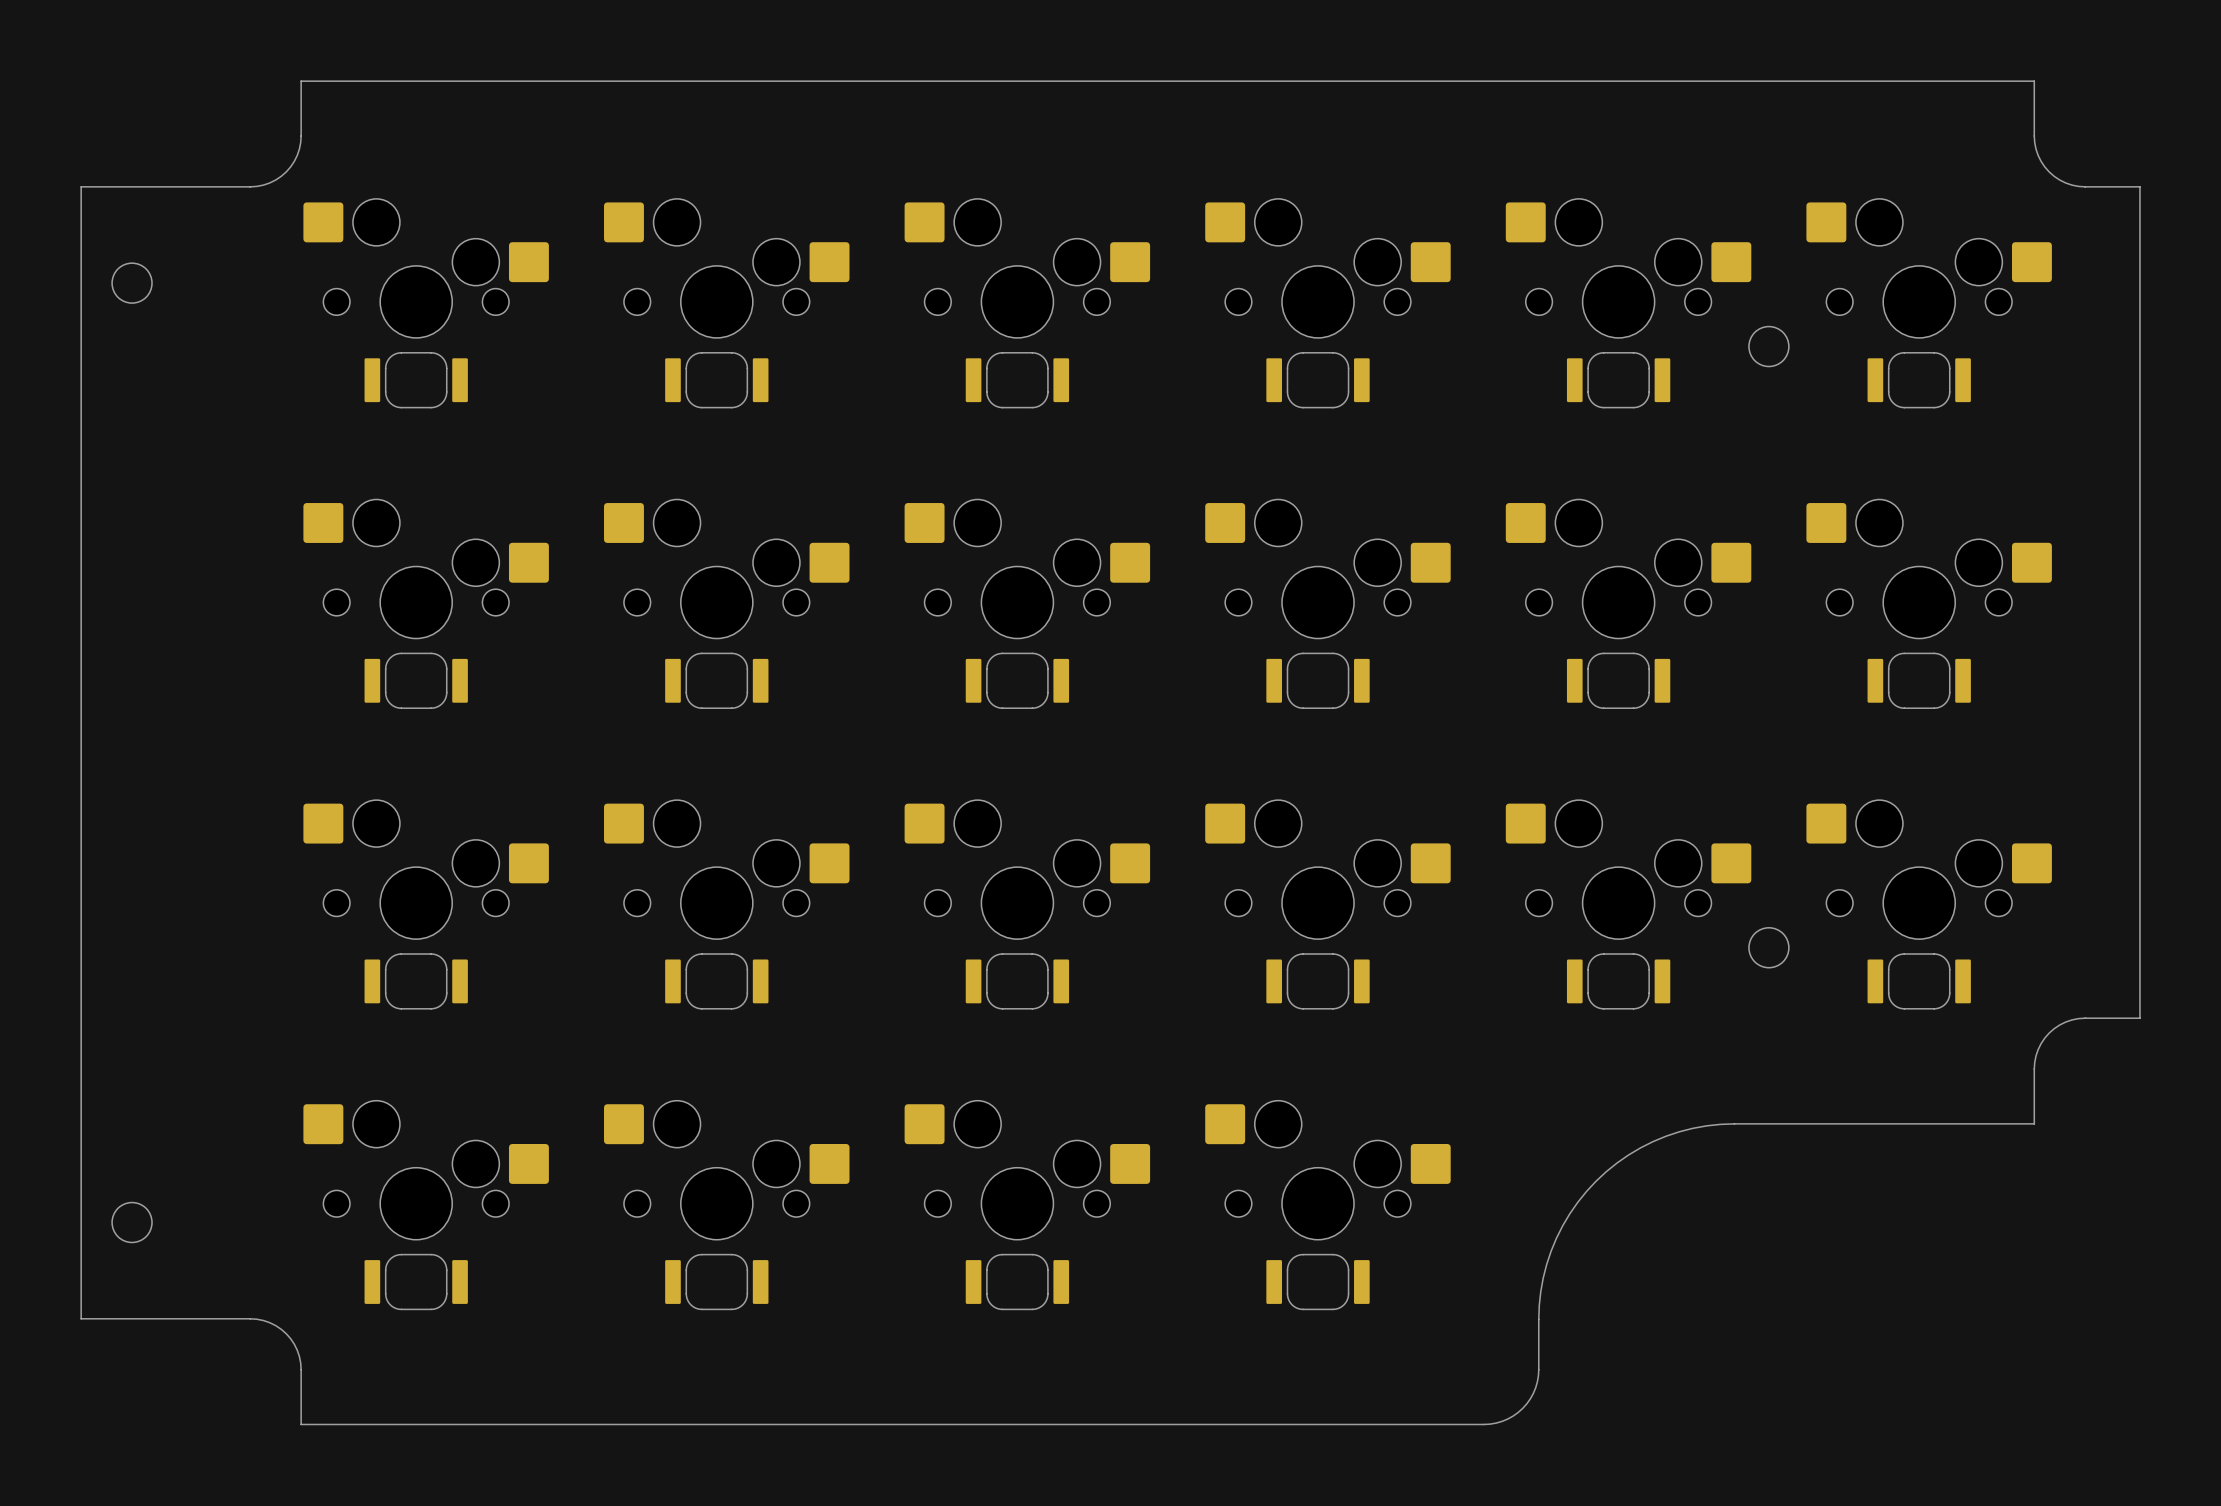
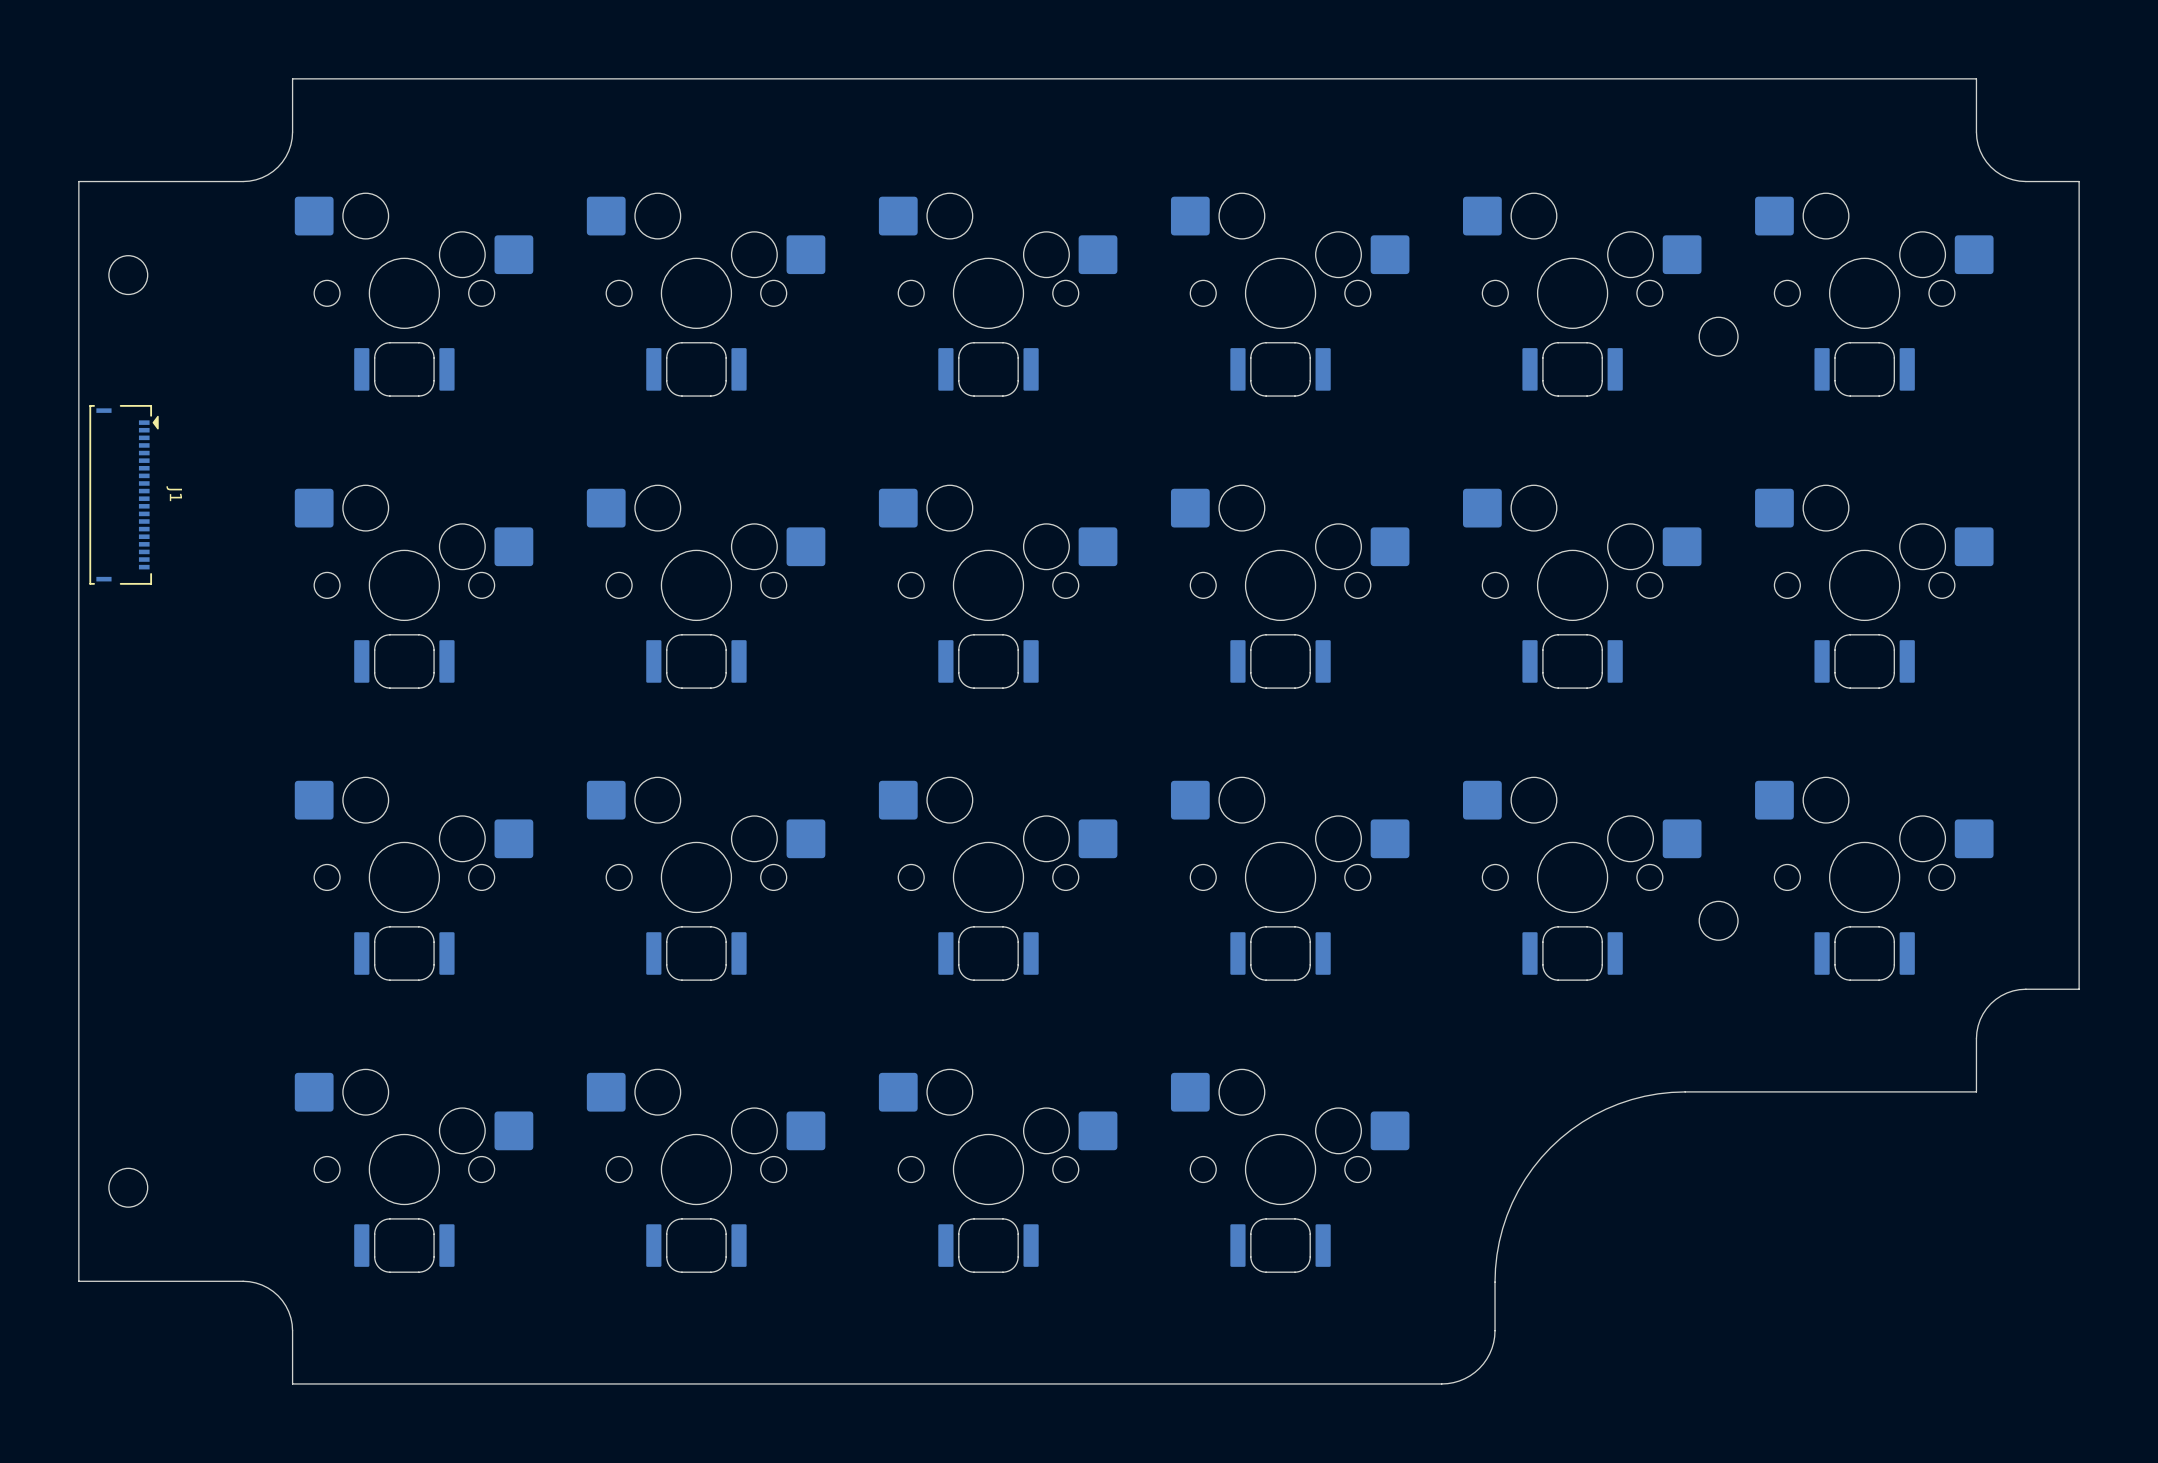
J1: none -> (124, 494)

